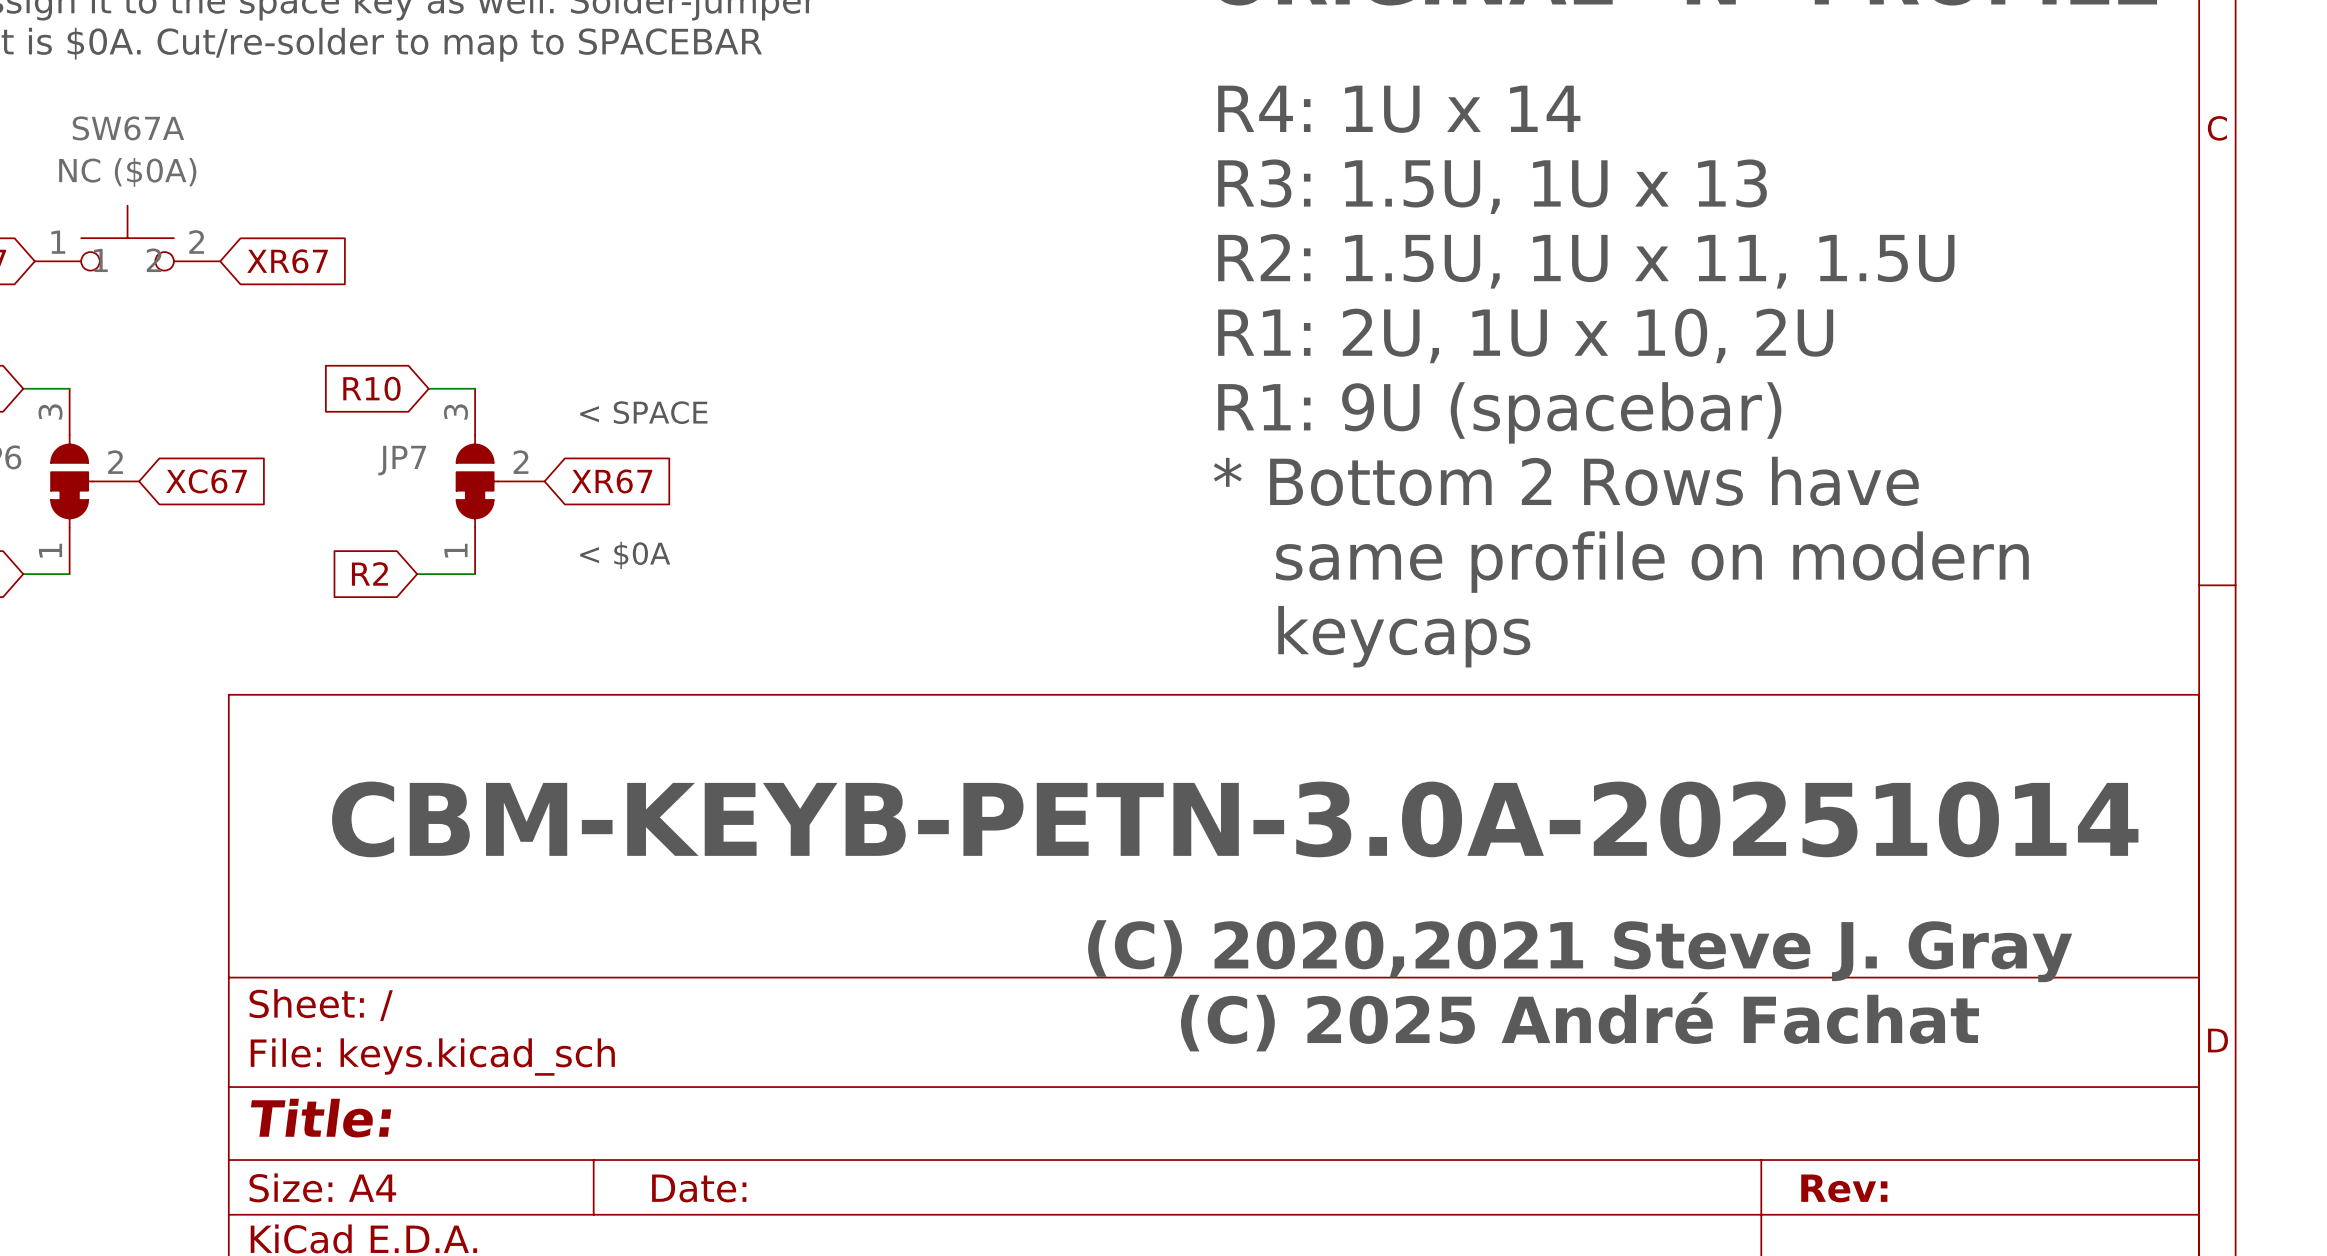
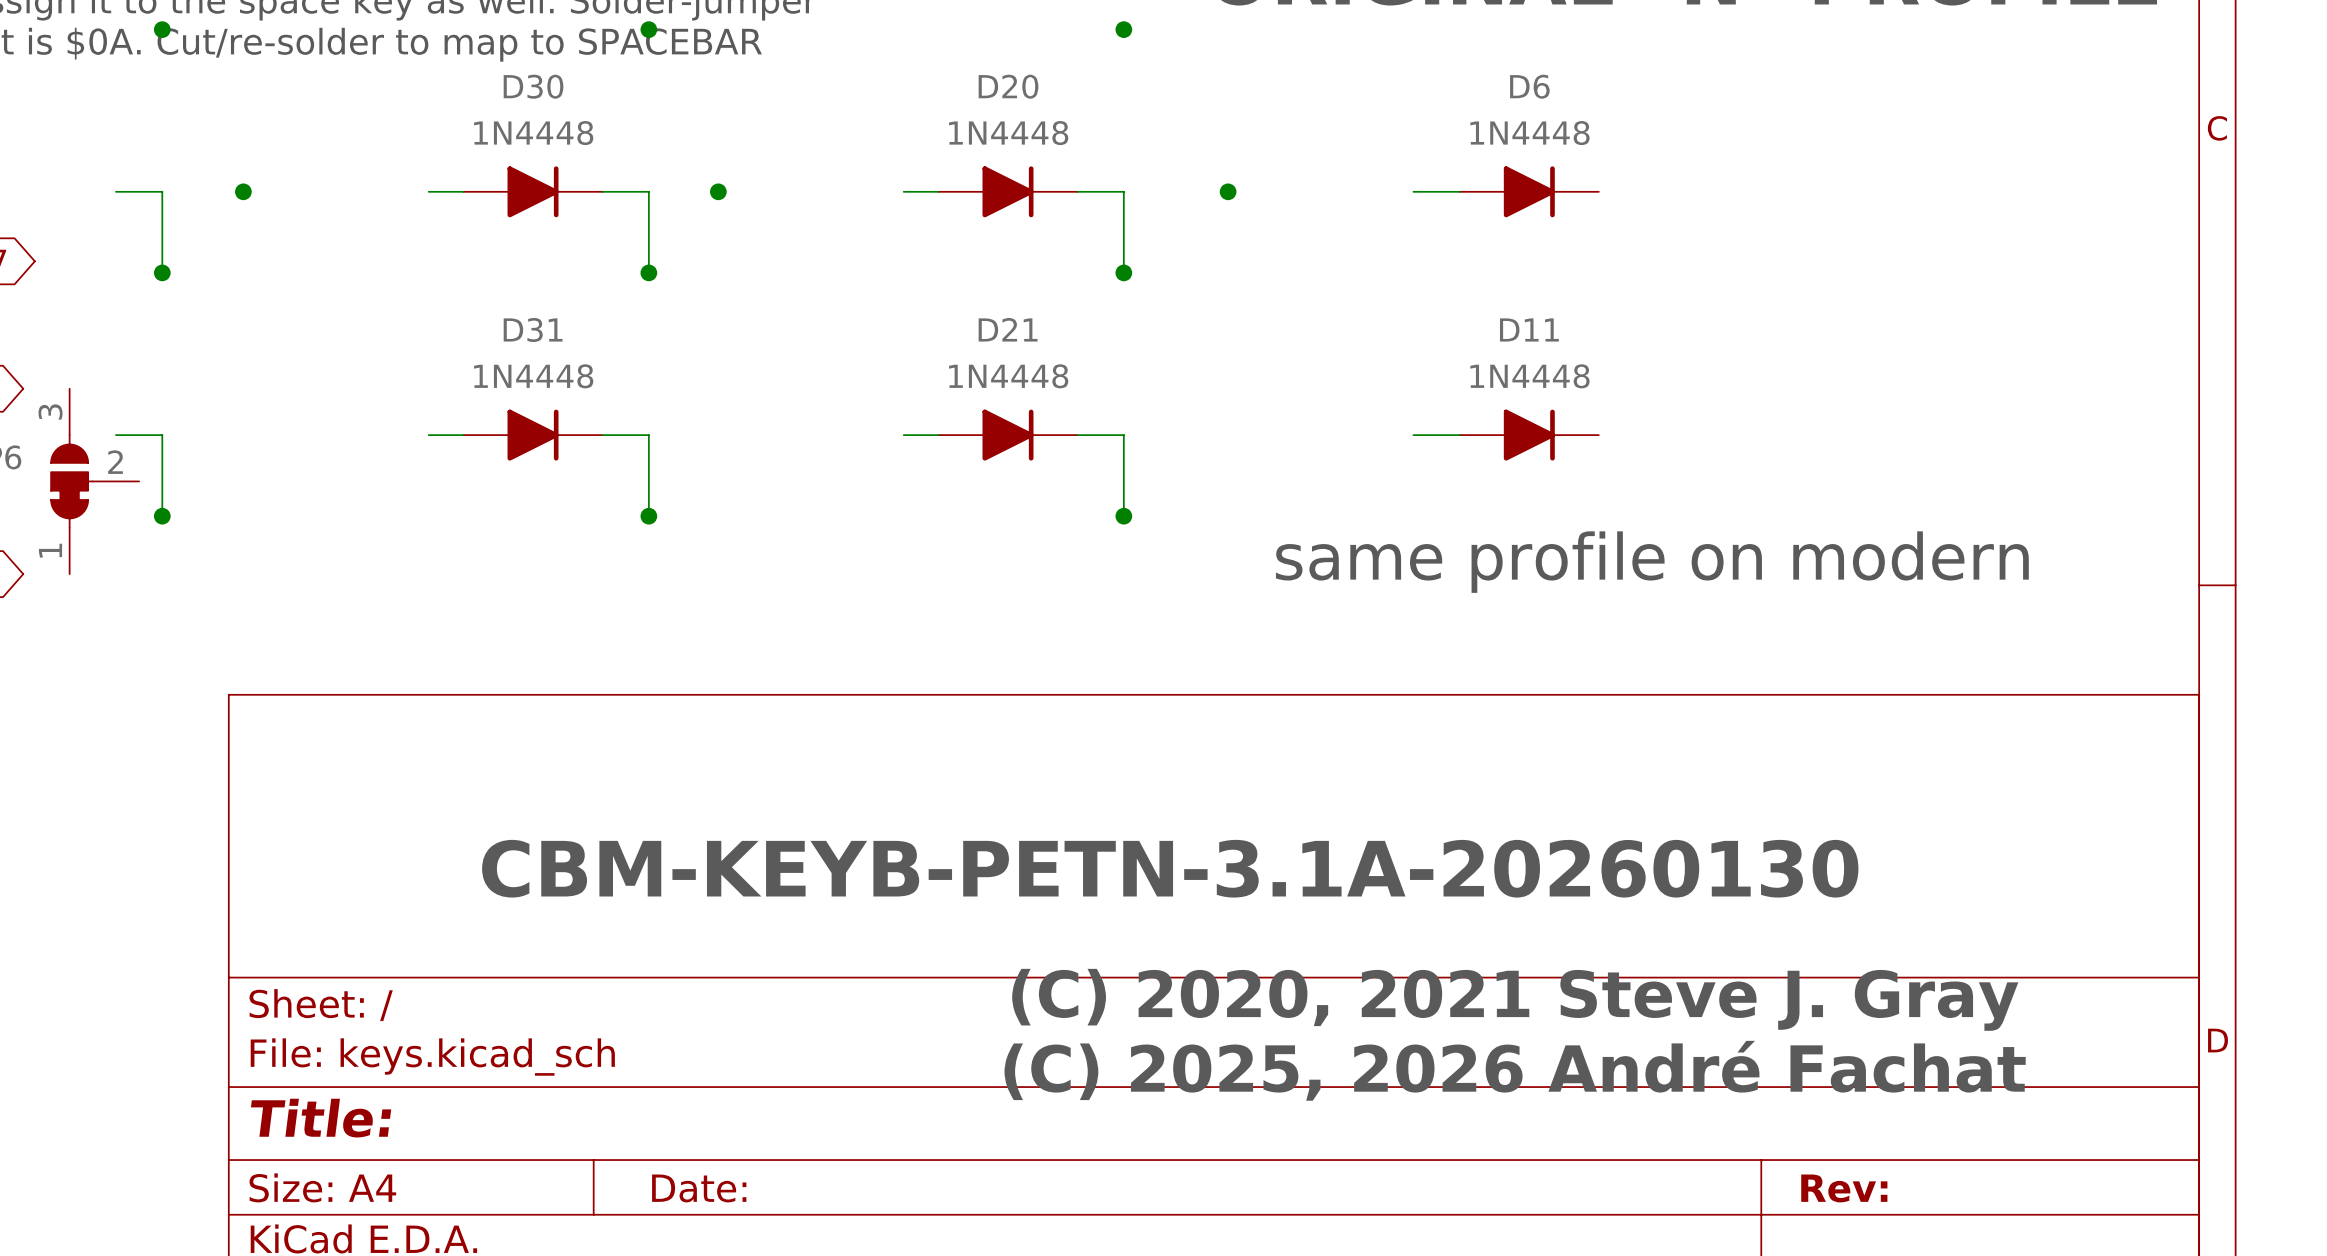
junction: none -> (162, 29)
junction: none -> (648, 29)
junction: none -> (1123, 29)
text: R4: 1U x 14 (1399, 109) -> none
text: R3: 1.5U, 1U x 13 (1492, 186) -> none
wire: none -> (115, 191) (162, 191) (162, 272)
junction: none -> (243, 191)
wire: none -> (428, 191) (463, 191)
D30: none -> 1N4448 (533, 191)
wire: none -> (602, 191) (648, 191) (648, 272)
junction: none -> (718, 191)
wire: none -> (903, 191) (938, 191)
D20: none -> 1N4448 (1007, 191)
wire: none -> (1077, 191) (1123, 191) (1123, 272)
junction: none -> (1228, 191)
wire: none -> (1413, 191) (1459, 191)
D6: none -> 1N4448 (1529, 191)
SW67A: NC ($0A) (127, 238) -> none
global label: XR67 (287, 261) -> none
text: R2: 1.5U, 1U x 11, 1.5U (1586, 261) -> none
junction: none -> (162, 272)
junction: none -> (648, 272)
junction: none -> (1123, 272)
text: R1: 2U, 1U x 10, 2U (1525, 335) -> none
wire: (23, 388) (69, 388) -> none
global label: R10 (371, 388) -> none
wire: (428, 388) (475, 388) -> none
text: < SPACE (643, 412) -> none
text: R1: 9U (spacebar) (1499, 412) -> none
wire: none -> (115, 435) (162, 435) (162, 516)
wire: none -> (428, 435) (463, 435)
D31: none -> 1N4448 (533, 435)
wire: none -> (602, 435) (648, 435) (648, 516)
wire: none -> (903, 435) (938, 435)
D21: none -> 1N4448 (1007, 435)
wire: none -> (1077, 435) (1123, 435) (1123, 516)
wire: none -> (1413, 435) (1459, 435)
D11: none -> 1N4448 (1529, 435)
global label: XC67 (206, 481) -> none
JP7: (500, 481) -> none
global label: XR67 (611, 481) -> none
text: * Bottom 2 Rows have (1566, 481) -> none
junction: none -> (162, 516)
junction: none -> (648, 516)
junction: none -> (1123, 516)
text: < $0A (625, 555) -> none
global label: R2 (369, 573) -> none
wire: (23, 574) (69, 574) -> none
wire: (417, 574) (475, 574) -> none
text: keycaps (1404, 636) -> none
text: CBM-KEYB-PETN-3.0A-20251014 (1235, 819) -> CBM-KEYB-PETN-3.1A-20260130 (1170, 868)
text: (C) 2020,2021 Steve J. Gray (1580, 951) -> (C) 2020, 2021 Steve J. Gray (1515, 999)
text: (C) 2025 André Fachat (1579, 1021) -> (C) 2025, 2026 André Fachat (1515, 1070)

